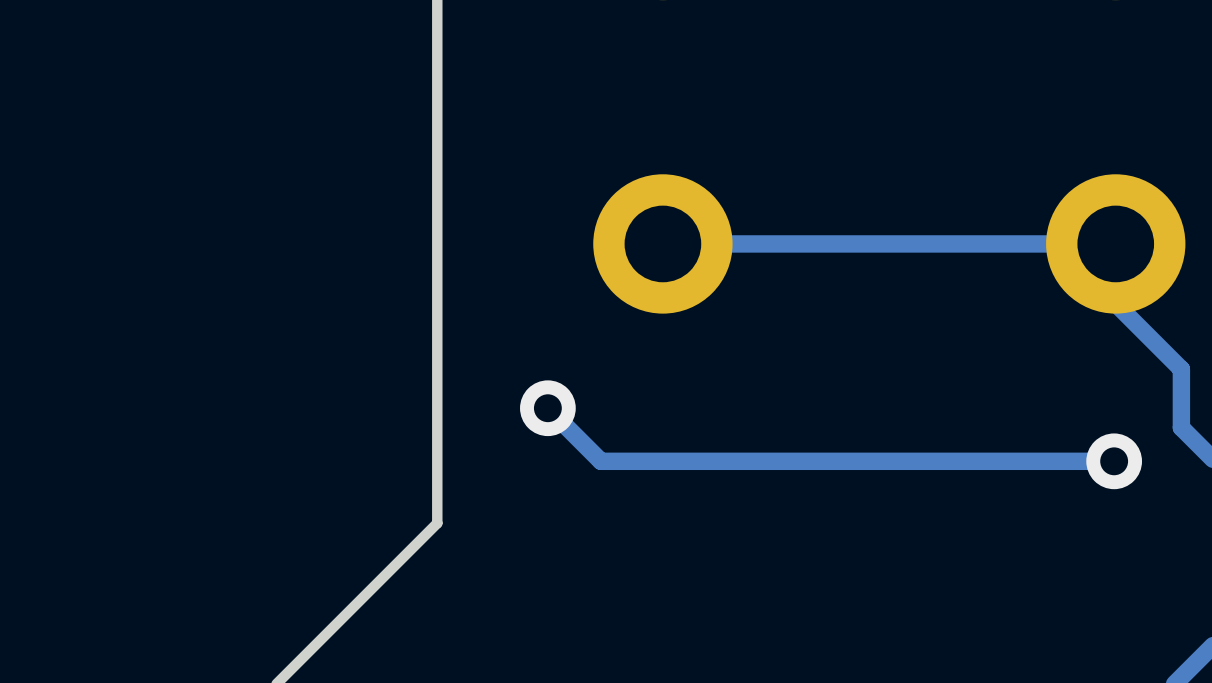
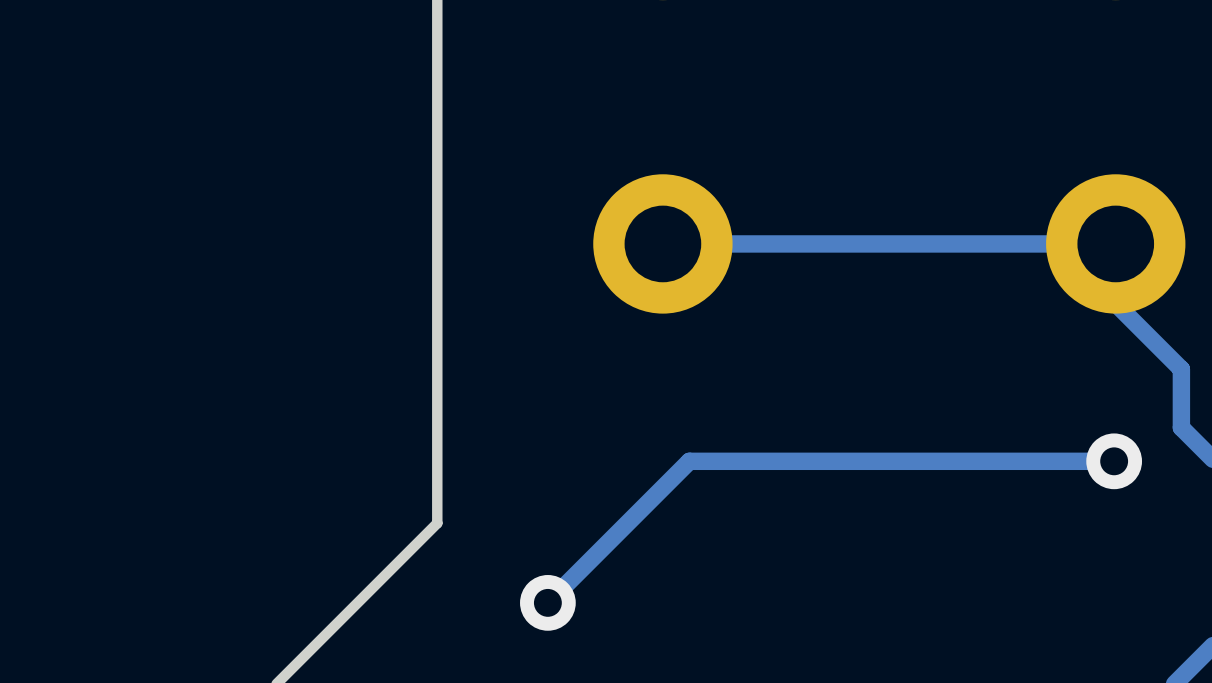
track: (547, 408) (600, 461) (689, 461) -> (547, 602) (689, 461)
via position: (547, 408) -> (547, 602)

